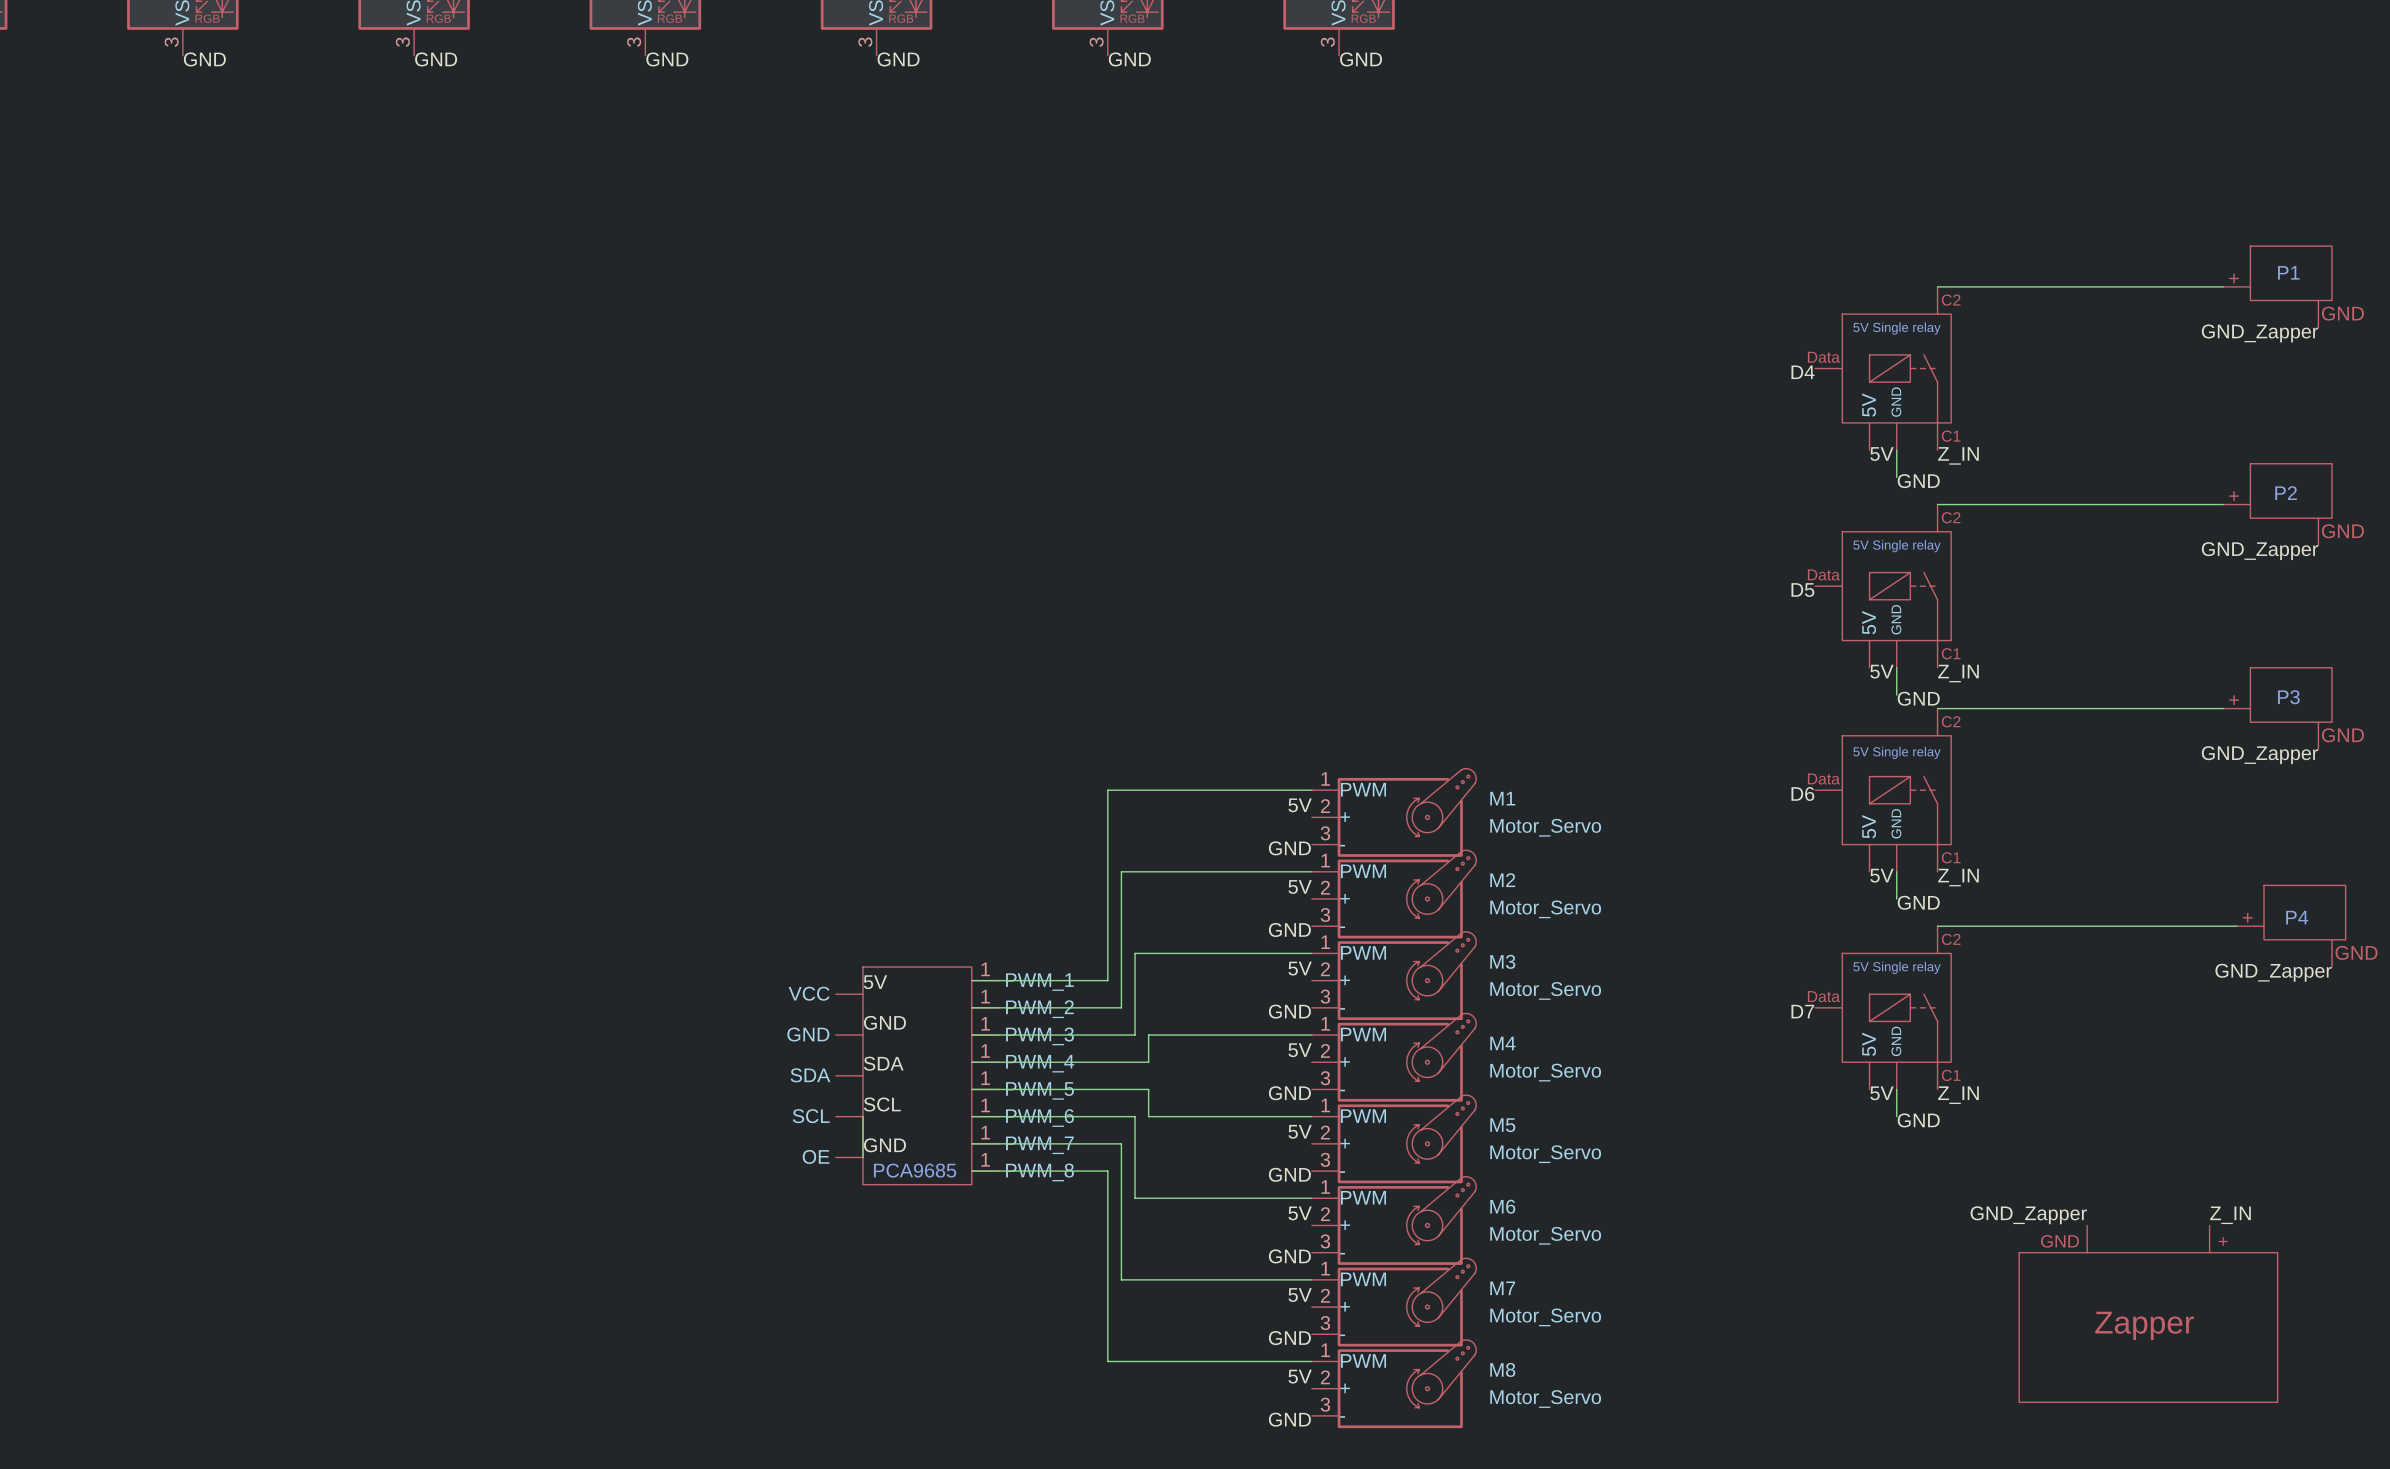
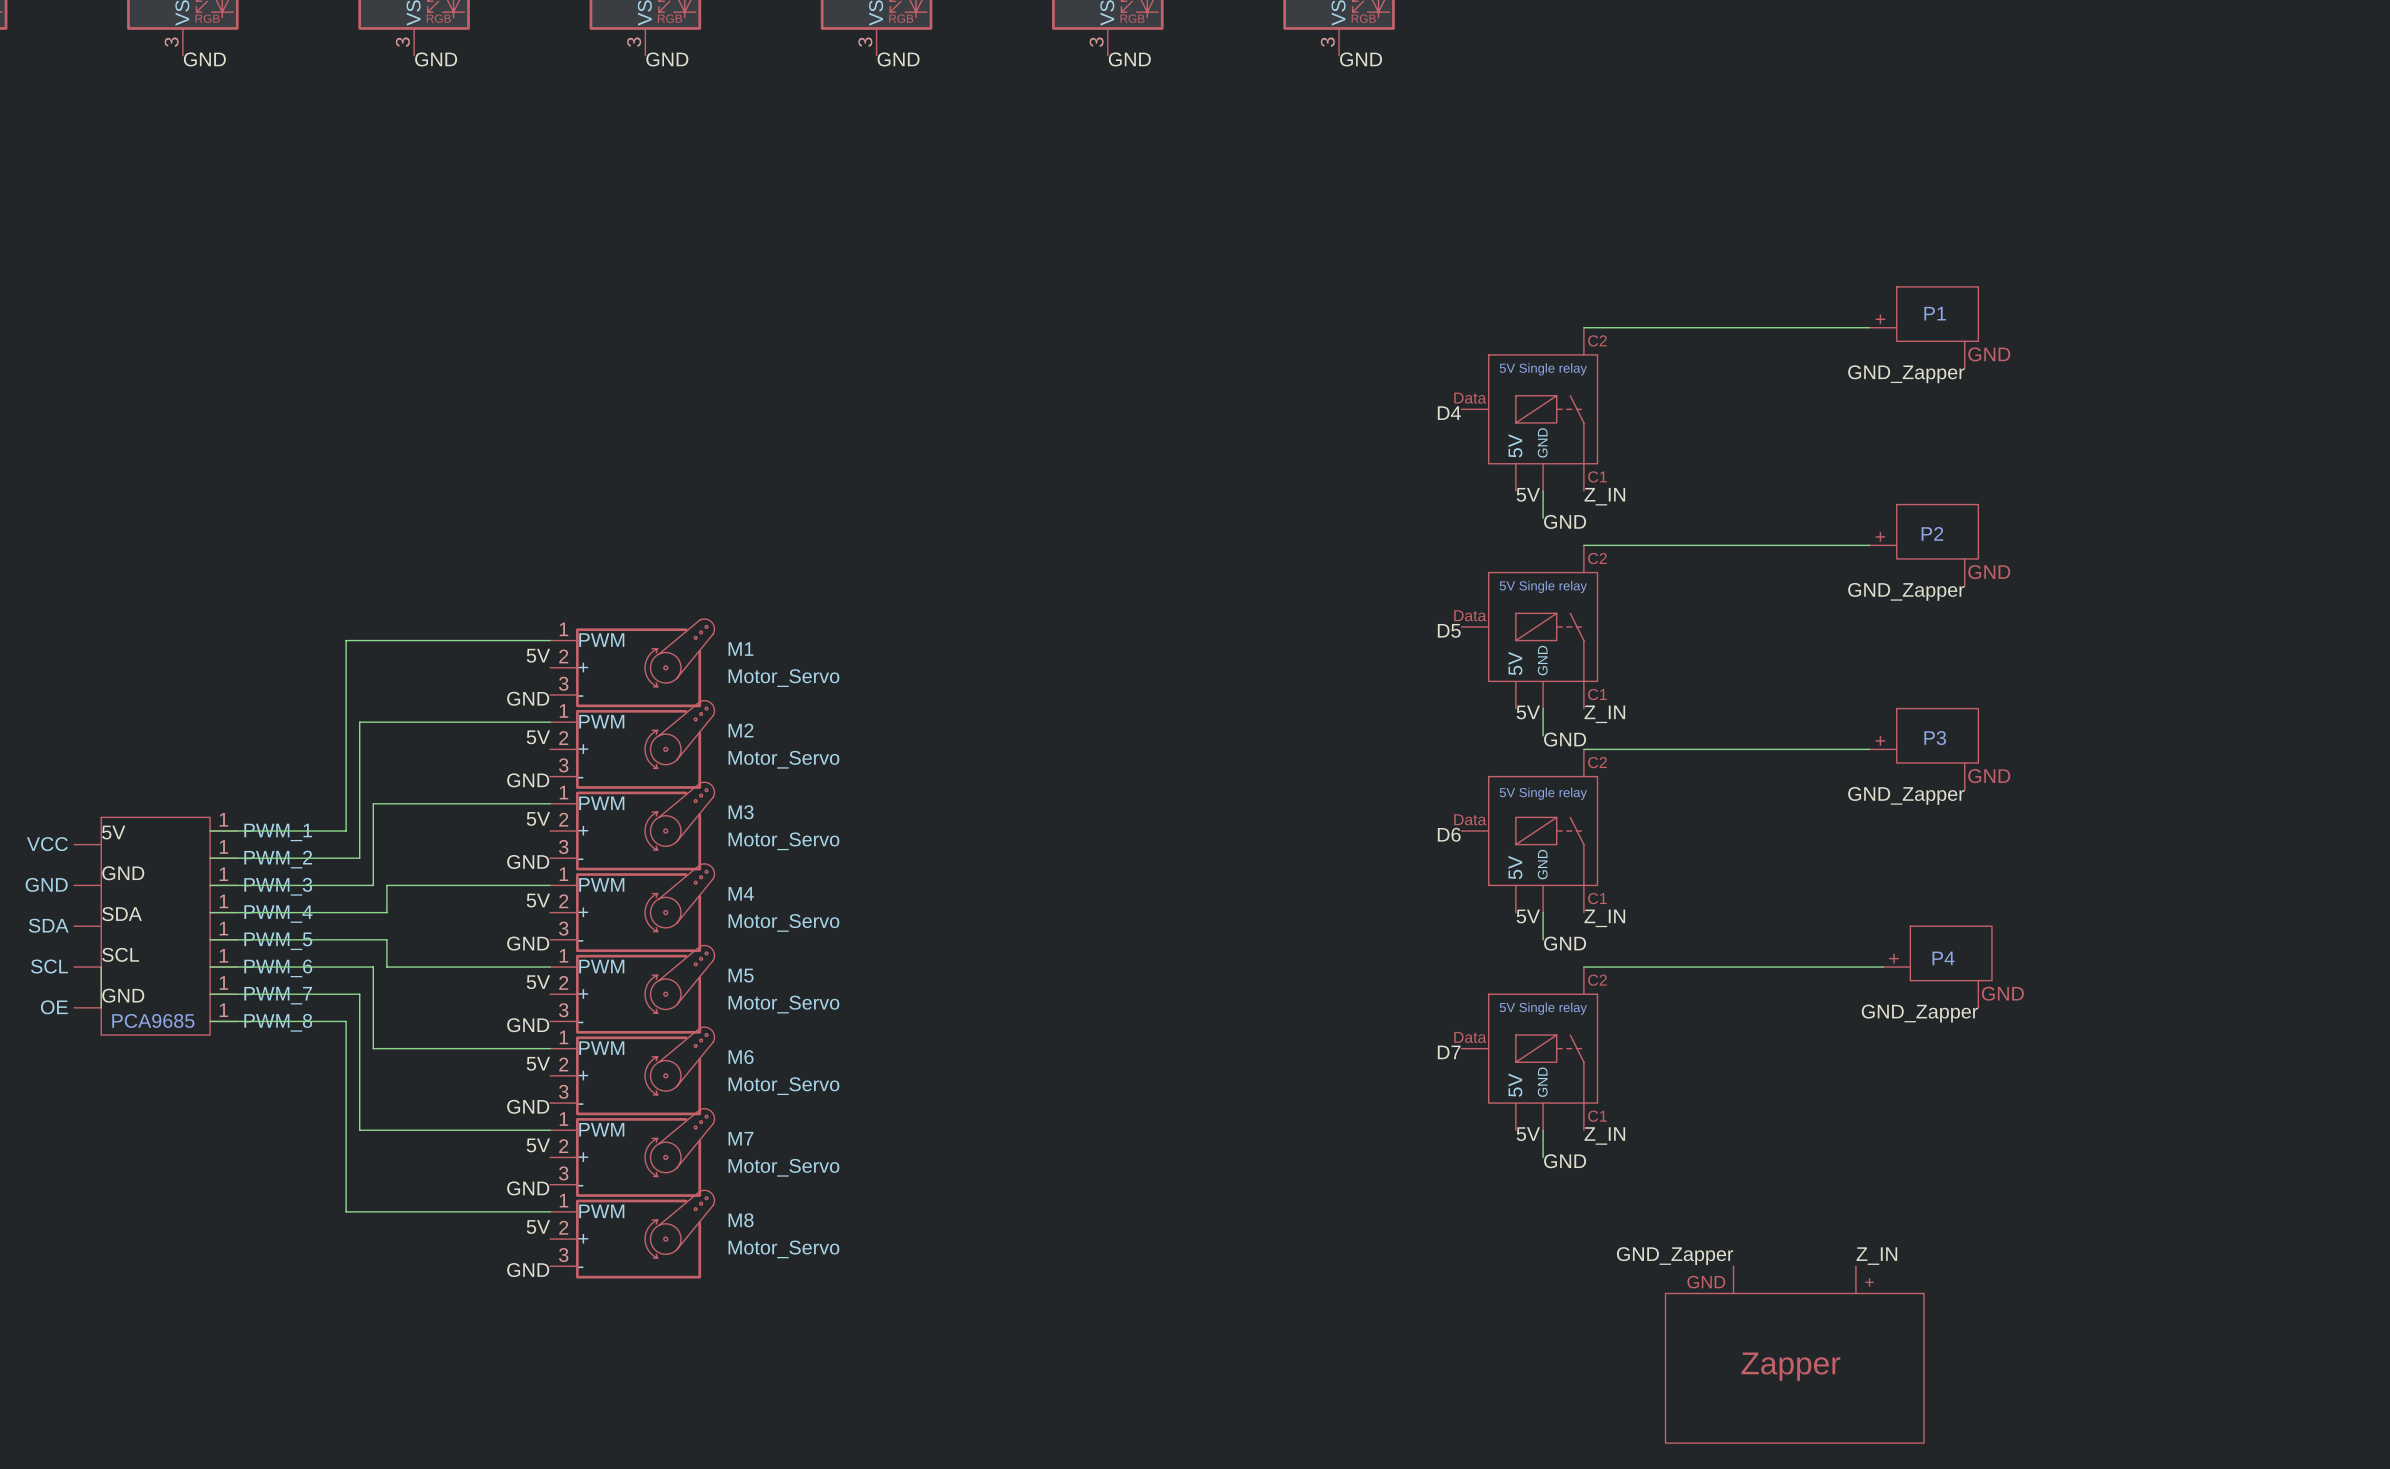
text: P1 (2288, 272) -> none
wire: (1937, 286) (2223, 286) -> none
part: (2277, 286) -> none
text: none -> P1 (1935, 313)
wire: none -> (1583, 327) (1869, 327)
part: none -> (1923, 327)
text: 5V Single relay (1896, 328) -> none
label: GND_Zapper (2259, 333) -> none
part: (1883, 368) -> none
text: none -> 5V Single relay (1543, 369)
label: D4 (1803, 372) -> none
label: none -> GND_Zapper (1906, 374)
part: none -> (1529, 409)
label: none -> D4 (1449, 413)
wire: (1896, 450) (1896, 477) -> none
label: 5V (1881, 454) -> none
label: Z_IN (1958, 455) -> none
label: GND (1918, 481) -> none
wire: none -> (1543, 490) (1543, 518)
text: P2 (2286, 493) -> none
label: none -> 5V (1528, 494)
label: none -> Z_IN (1604, 496)
wire: (1937, 504) (2223, 504) -> none
part: (2277, 504) -> none
label: none -> GND (1565, 521)
text: none -> P2 (1932, 533)
wire: none -> (1583, 545) (1869, 545)
part: none -> (1923, 545)
text: 5V Single relay (1896, 546) -> none
label: GND_Zapper (2259, 551) -> none
text: none -> 5V Single relay (1543, 586)
part: (1883, 586) -> none
label: D5 (1802, 590) -> none
label: none -> GND_Zapper (1906, 591)
part: none -> (1529, 626)
label: none -> D5 (1449, 630)
wire: none -> (550, 640) (346, 640) (346, 831) (210, 831)
label: none -> 5V (538, 655)
wire: (1896, 667) (1896, 694) -> none
label: 5V (1881, 671) -> none
label: Z_IN (1958, 673) -> none
text: P3 (2288, 697) -> none
label: none -> GND (528, 698)
label: GND (1918, 698) -> none
wire: none -> (1543, 708) (1543, 735)
wire: (1937, 708) (2223, 708) -> none
part: (2277, 708) -> none
label: none -> 5V (1528, 712)
label: none -> Z_IN (1604, 714)
wire: none -> (550, 722) (359, 722) (359, 858) (210, 858)
label: none -> 5V (538, 737)
text: none -> P3 (1935, 738)
label: none -> GND (1565, 739)
wire: none -> (1583, 749) (1869, 749)
part: none -> (1923, 749)
text: 5V Single relay (1896, 752) -> none
label: GND_Zapper (2259, 755) -> none
label: none -> GND (528, 780)
wire: (1311, 790) (1107, 790) (1107, 980) (971, 980) -> none
part: (1883, 790) -> none
text: none -> 5V Single relay (1543, 793)
label: D6 (1802, 793) -> none
label: none -> GND_Zapper (1906, 795)
wire: none -> (550, 803) (373, 803) (373, 885) (210, 885)
label: 5V (1300, 805) -> none
M1 position: (1394, 812) -> (632, 663)
label: none -> 5V (538, 818)
part: none -> (1529, 831)
label: none -> 5V (113, 832)
label: none -> D6 (1449, 834)
label: GND (1289, 848) -> none
label: none -> GND (528, 861)
wire: (1311, 871) (1121, 871) (1121, 1007) (971, 1007) -> none
wire: (1896, 871) (1896, 899) -> none
label: none -> GND (123, 873)
label: 5V (1881, 875) -> none
label: Z_IN (1958, 877) -> none
wire: none -> (550, 885) (386, 885) (386, 912) (210, 912)
label: 5V (1300, 886) -> none
M2 position: (1394, 894) -> (632, 744)
label: none -> 5V (538, 900)
label: GND (1918, 902) -> none
wire: none -> (1543, 912) (1543, 939)
label: none -> SDA (122, 914)
label: none -> 5V (1528, 916)
text: P4 (2297, 917) -> none
label: none -> Z_IN (1604, 918)
part: none -> (155, 926)
wire: (1937, 926) (2236, 926) -> none
part: (2291, 926) -> none
label: GND (1289, 929) -> none
wire: none -> (210, 939) (386, 939) (386, 967) (550, 967)
label: none -> GND (528, 943)
label: none -> GND (1565, 943)
wire: (1311, 953) (1135, 953) (1135, 1035) (971, 1035) -> none
label: none -> SCL (120, 954)
text: none -> P4 (1943, 958)
wire: none -> (101, 967) (101, 1007)
wire: none -> (210, 967) (373, 967) (373, 1048) (550, 1048)
wire: none -> (1583, 967) (1883, 967)
text: 5V Single relay (1896, 967) -> none
part: none -> (1937, 967)
label: 5V (1300, 968) -> none
label: GND_Zapper (2273, 972) -> none
M3 position: (1394, 975) -> (632, 826)
label: none -> 5V (538, 982)
label: 5V (875, 982) -> none
wire: none -> (210, 994) (359, 994) (359, 1130) (550, 1130)
label: none -> GND (123, 995)
part: (1883, 1007) -> none
text: none -> 5V Single relay (1543, 1008)
label: GND (1289, 1011) -> none
label: D7 (1802, 1011) -> none
label: none -> GND_Zapper (1919, 1013)
text: none -> PCA9685 (153, 1020)
wire: none -> (210, 1021) (346, 1021) (346, 1211) (550, 1211)
label: GND (884, 1022) -> none
label: none -> GND (528, 1025)
wire: (1311, 1035) (1148, 1035) (1148, 1062) (971, 1062) -> none
part: none -> (1529, 1048)
label: 5V (1300, 1050) -> none
label: none -> D7 (1449, 1052)
M4 position: (1394, 1057) -> (632, 907)
label: none -> 5V (538, 1063)
label: SDA (883, 1063) -> none
part: (917, 1075) -> none
wire: (971, 1089) (1148, 1089) (1148, 1116) (1311, 1116) -> none
wire: (1896, 1089) (1896, 1116) -> none
label: GND (1289, 1093) -> none
label: 5V (1881, 1093) -> none
label: Z_IN (1958, 1095) -> none
label: SCL (882, 1104) -> none
label: none -> GND (528, 1106)
wire: (862, 1116) (862, 1157) -> none
wire: (971, 1116) (1135, 1116) (1135, 1198) (1311, 1198) -> none
label: GND (1918, 1120) -> none
wire: none -> (1543, 1130) (1543, 1157)
label: 5V (1300, 1131) -> none
label: none -> 5V (1528, 1134)
label: none -> Z_IN (1604, 1135)
M5 position: (1394, 1139) -> (632, 989)
wire: (971, 1143) (1121, 1143) (1121, 1279) (1311, 1279) -> none
label: none -> 5V (538, 1145)
label: GND (884, 1145) -> none
label: none -> GND (1565, 1161)
text: PCA9685 (915, 1170) -> none
wire: (971, 1171) (1107, 1171) (1107, 1361) (1311, 1361) -> none
label: GND (1289, 1174) -> none
label: none -> GND (528, 1188)
label: 5V (1300, 1213) -> none
label: GND_Zapper (2028, 1215) -> none
label: Z_IN (2230, 1215) -> none
M6 position: (1394, 1220) -> (632, 1071)
label: none -> 5V (538, 1227)
label: GND (1289, 1256) -> none
label: none -> GND_Zapper (1675, 1256)
label: none -> Z_IN (1876, 1256)
label: none -> GND (528, 1270)
label: 5V (1300, 1295) -> none
M7 position: (1394, 1302) -> (632, 1152)
part: (2148, 1313) -> none
label: GND (1289, 1338) -> none
part: none -> (1794, 1354)
label: 5V (1300, 1376) -> none
M8 position: (1394, 1384) -> (632, 1234)
label: GND (1289, 1419) -> none

